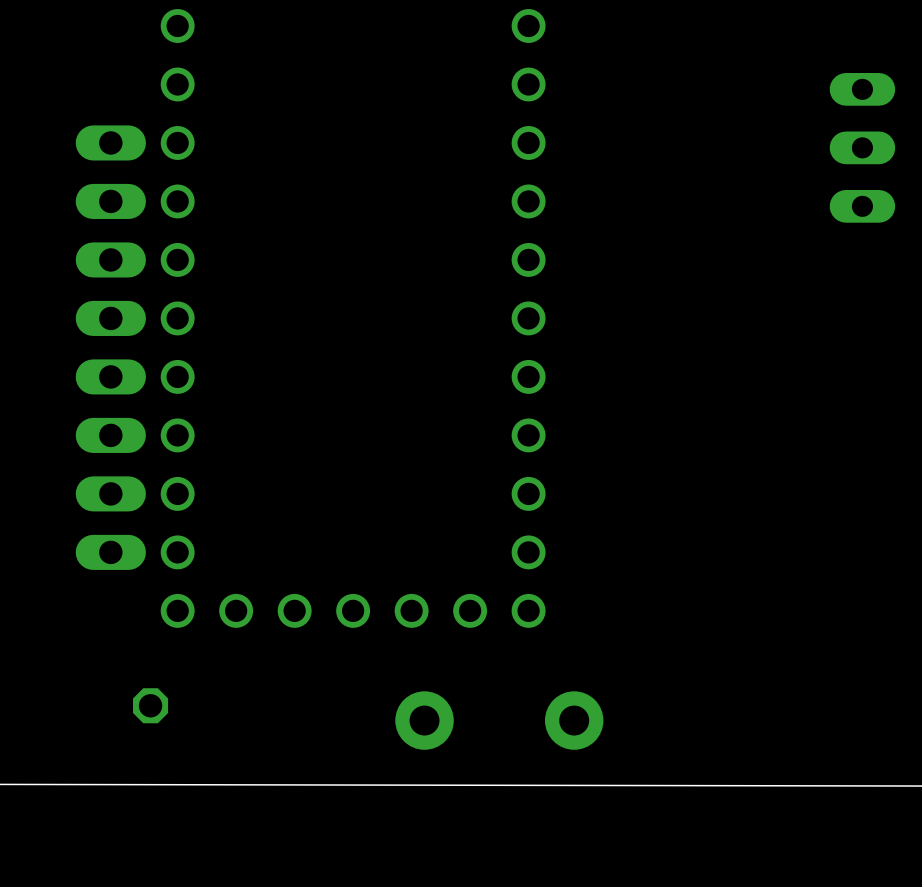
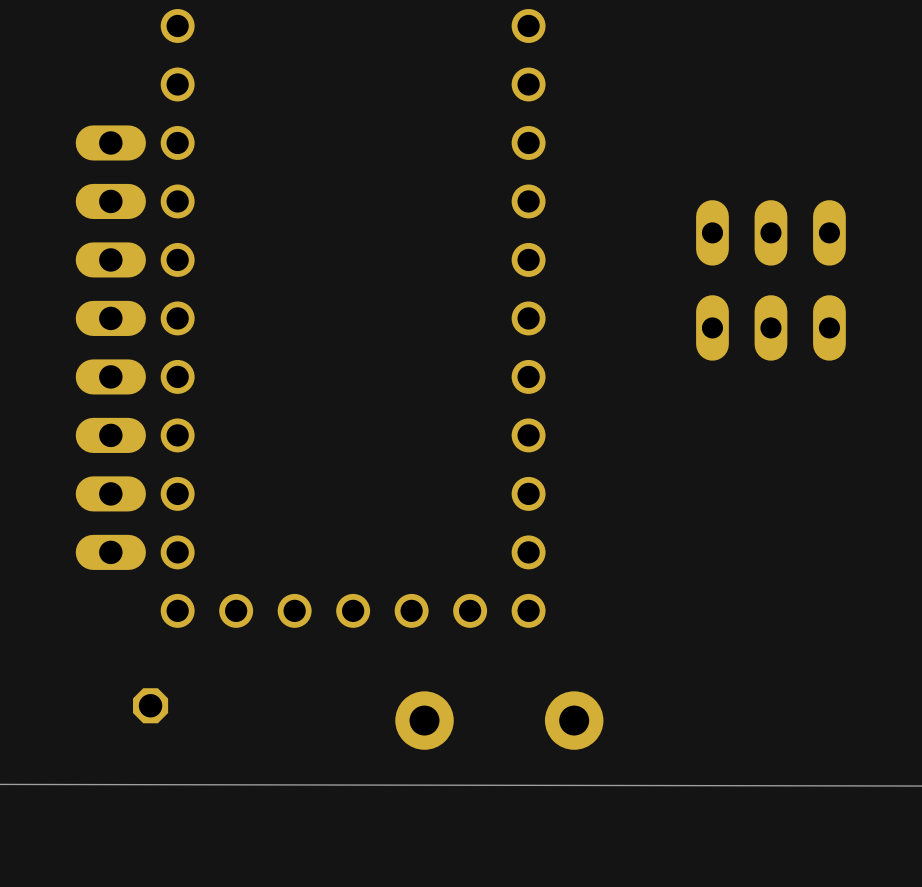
part: (862, 147) -> none
part: none -> (770, 232)
part: none -> (770, 327)

